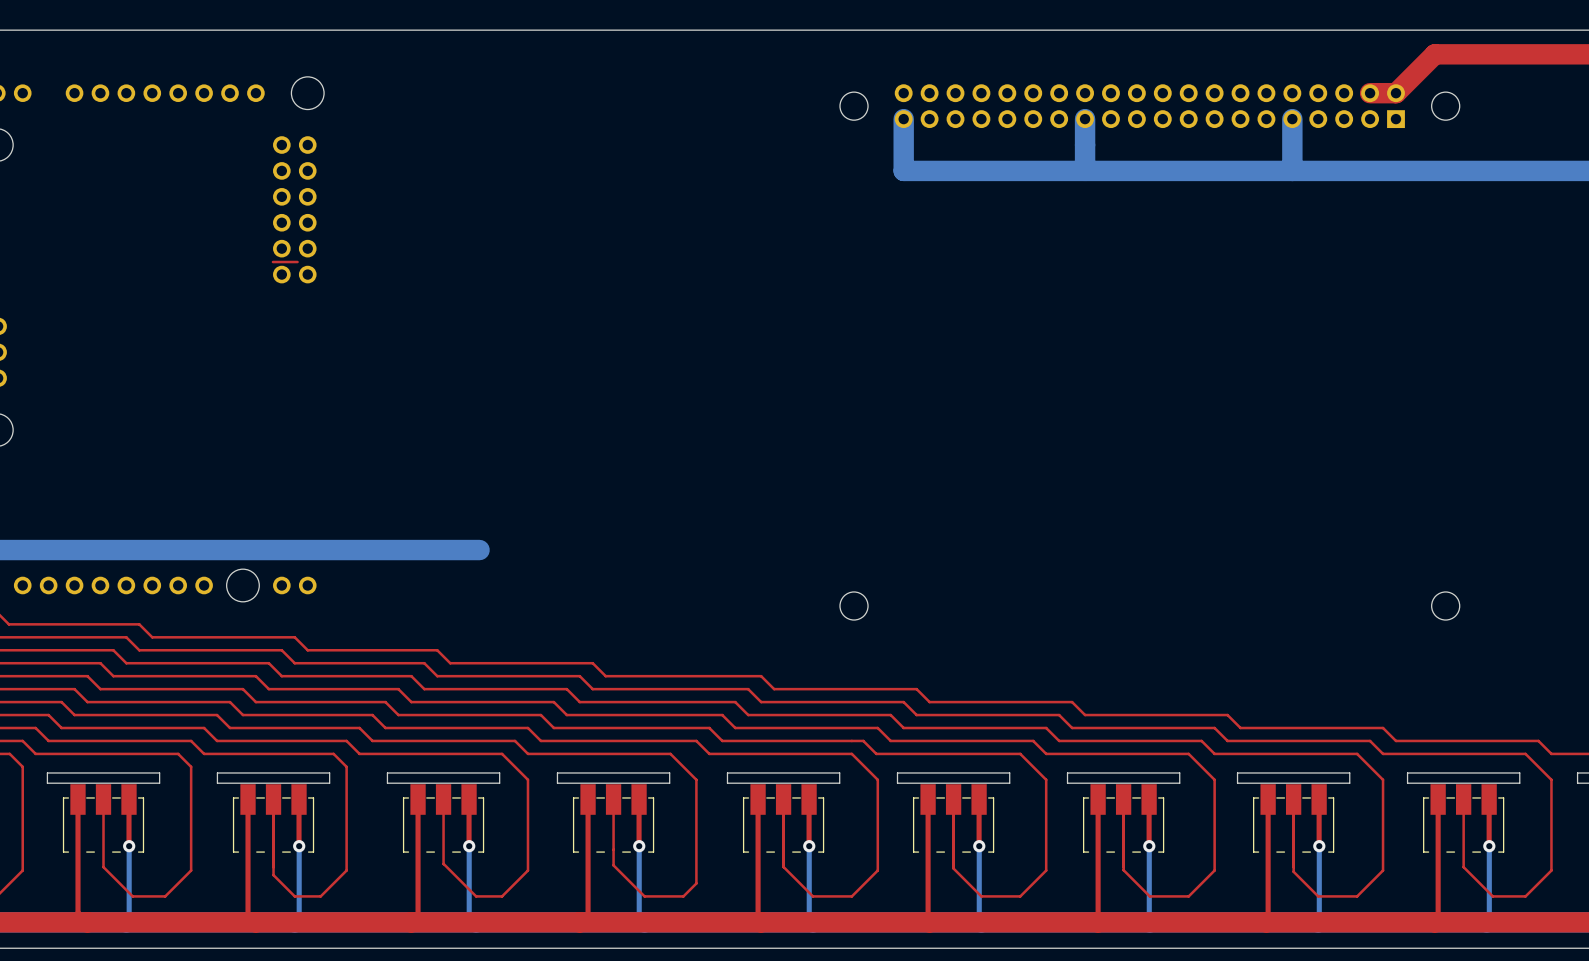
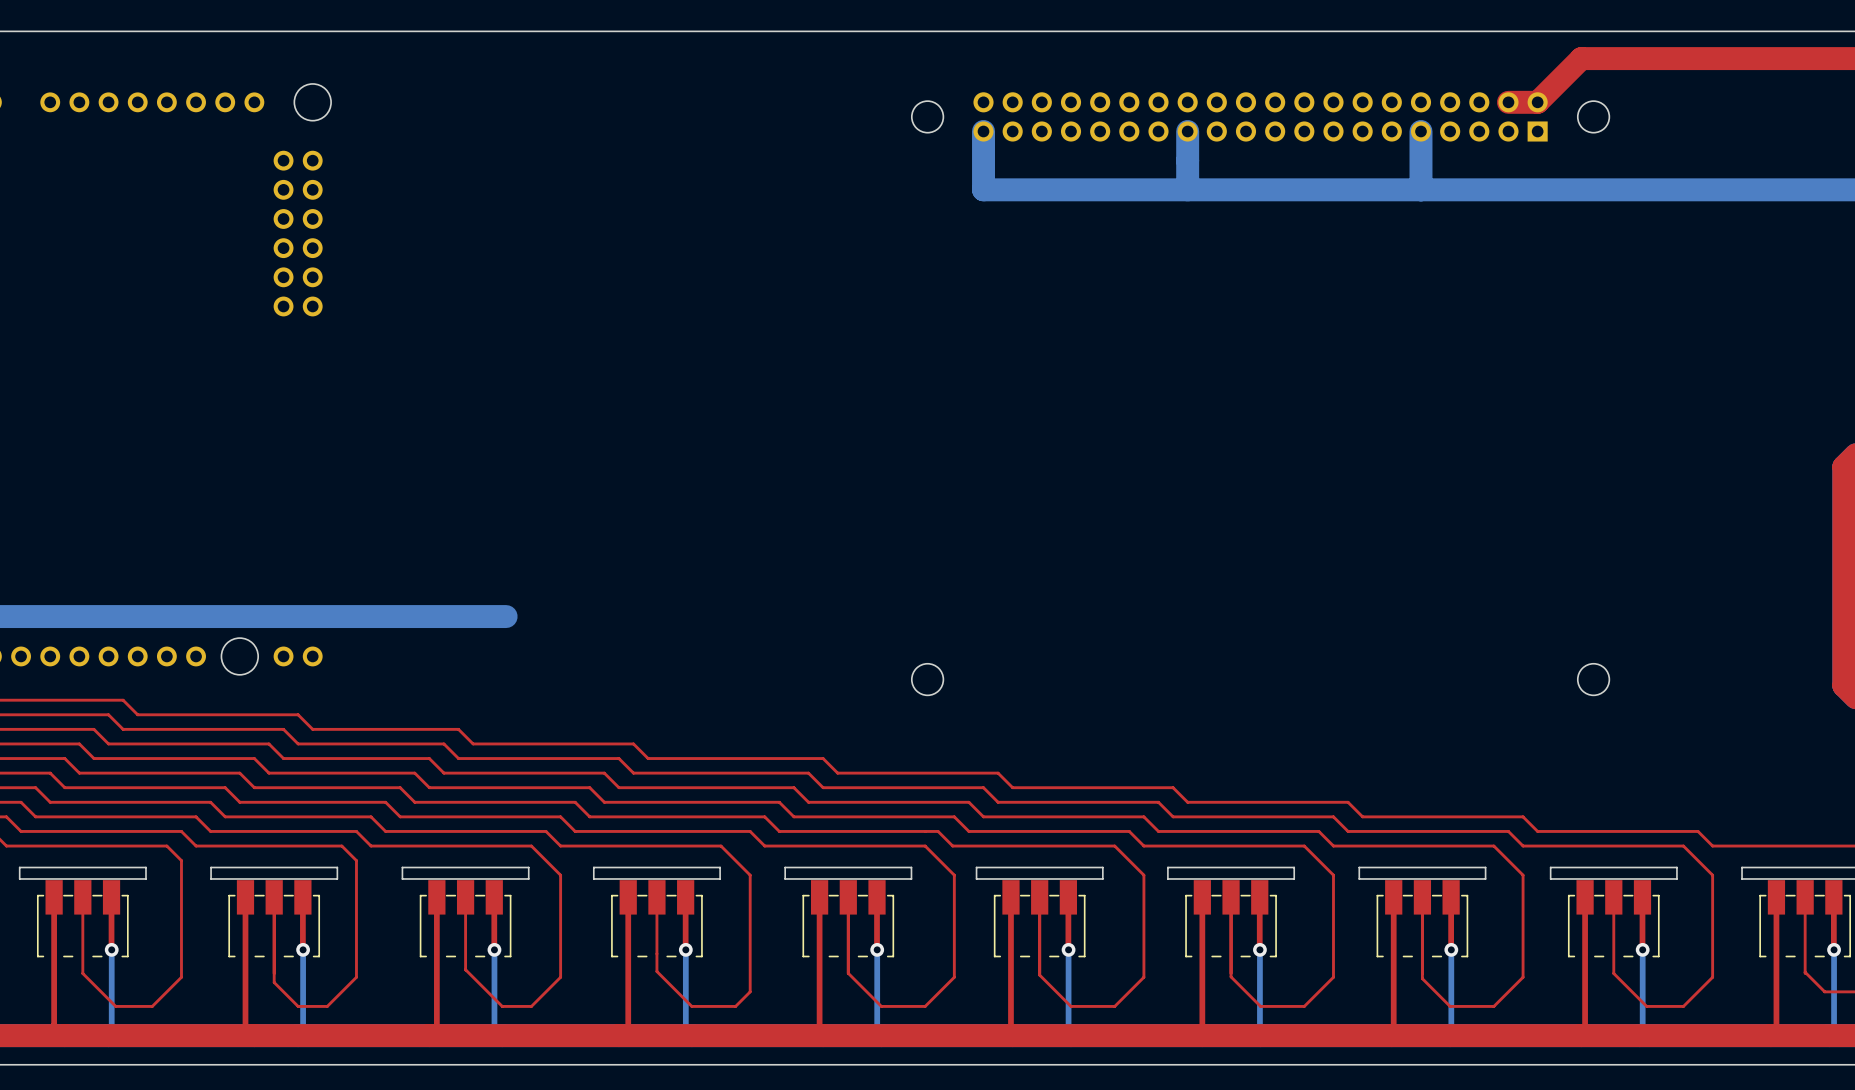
top track: (272, 262) (297, 262) -> none

